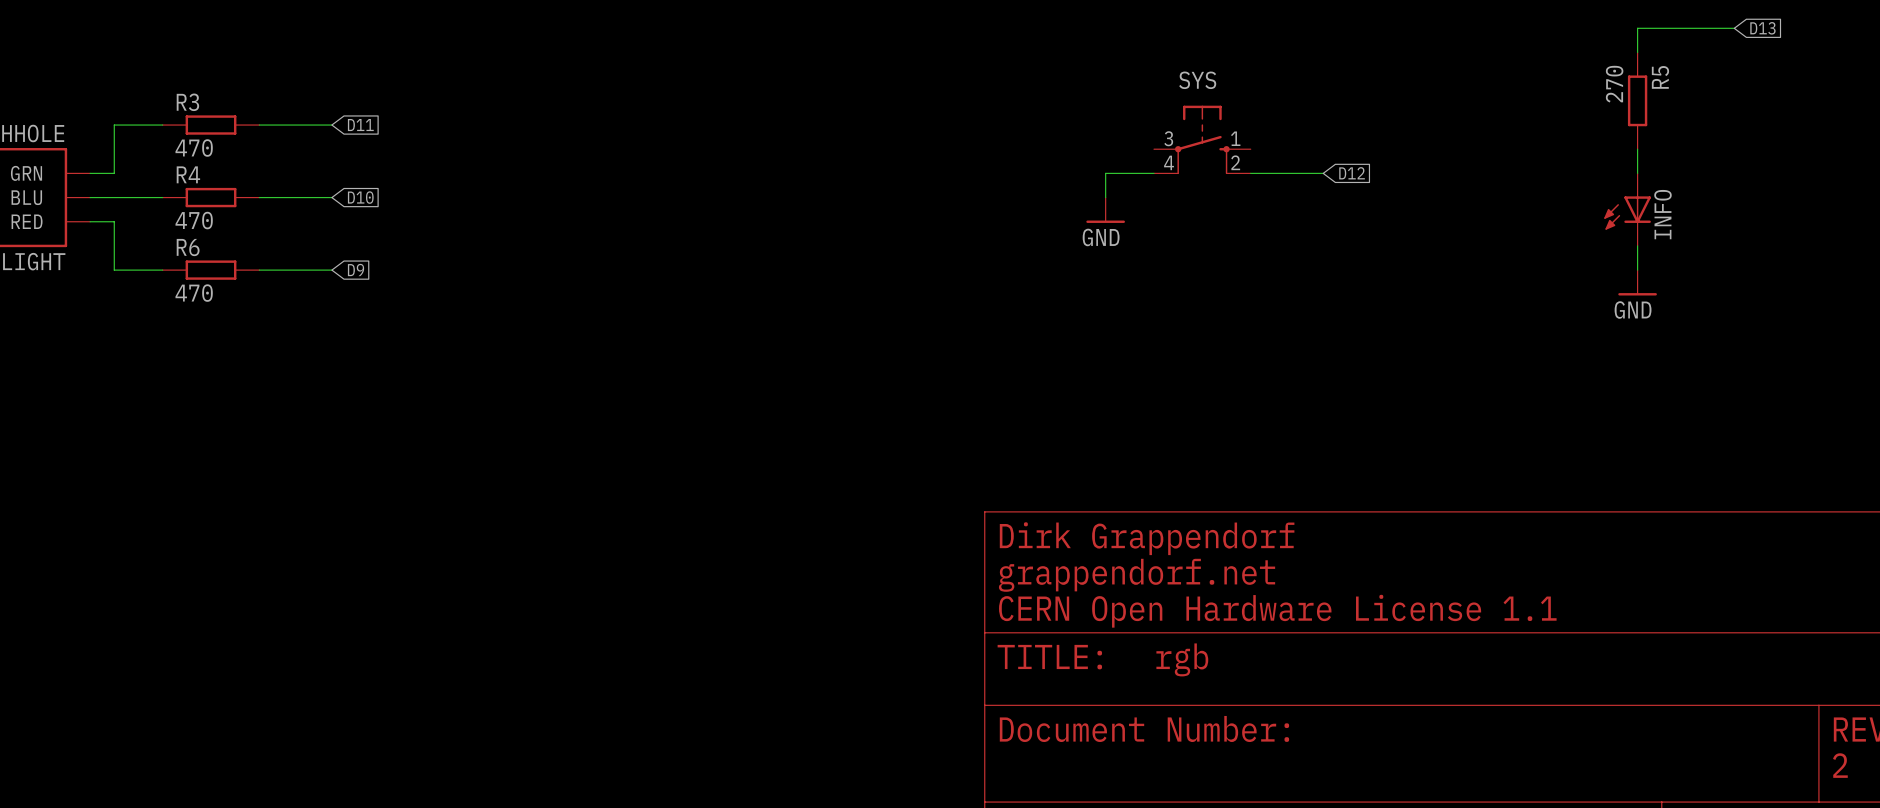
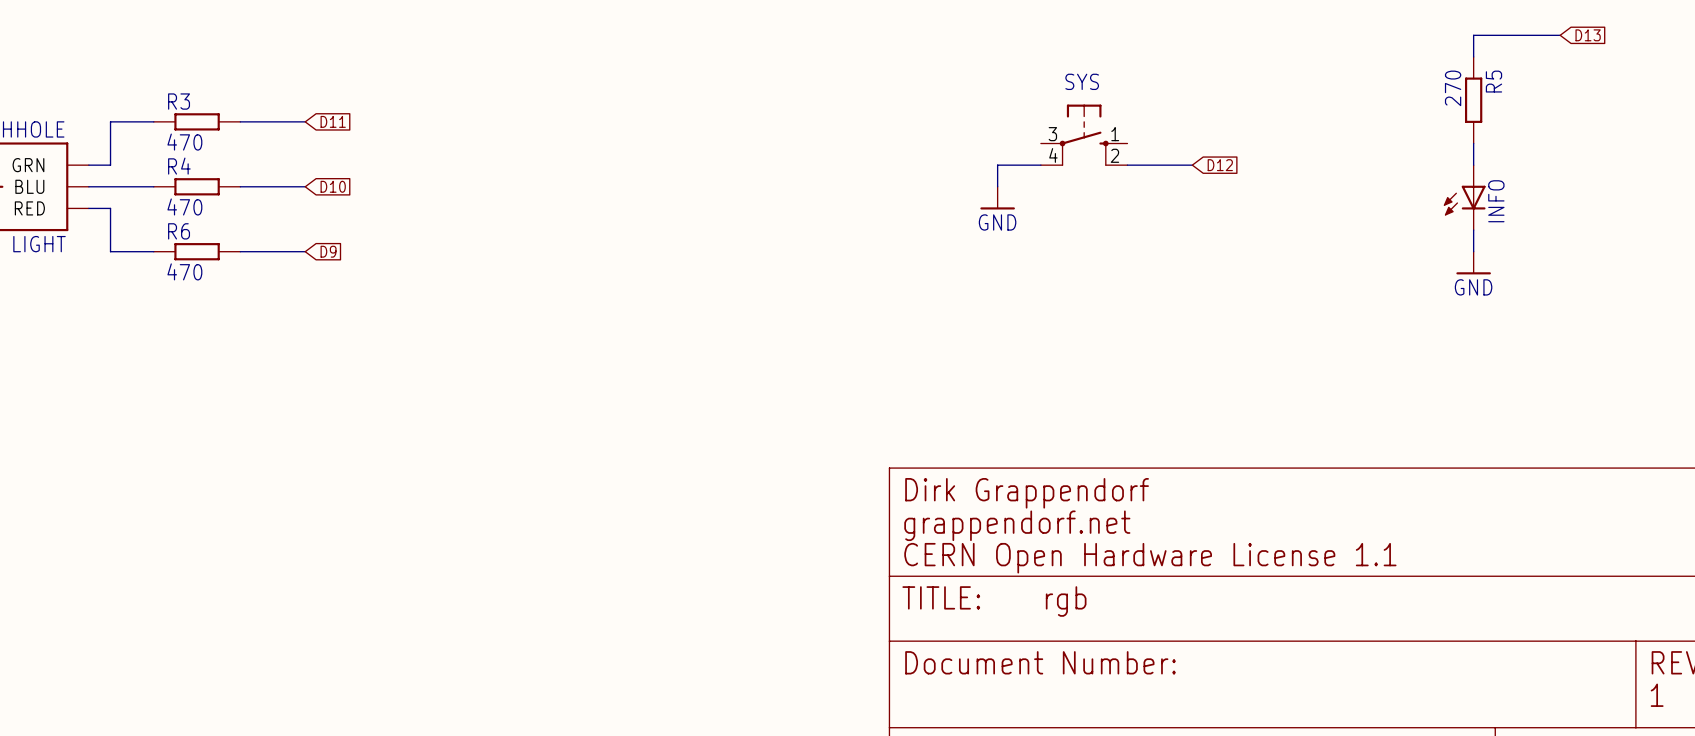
text: 2 (1840, 765) -> 1 (1657, 695)

